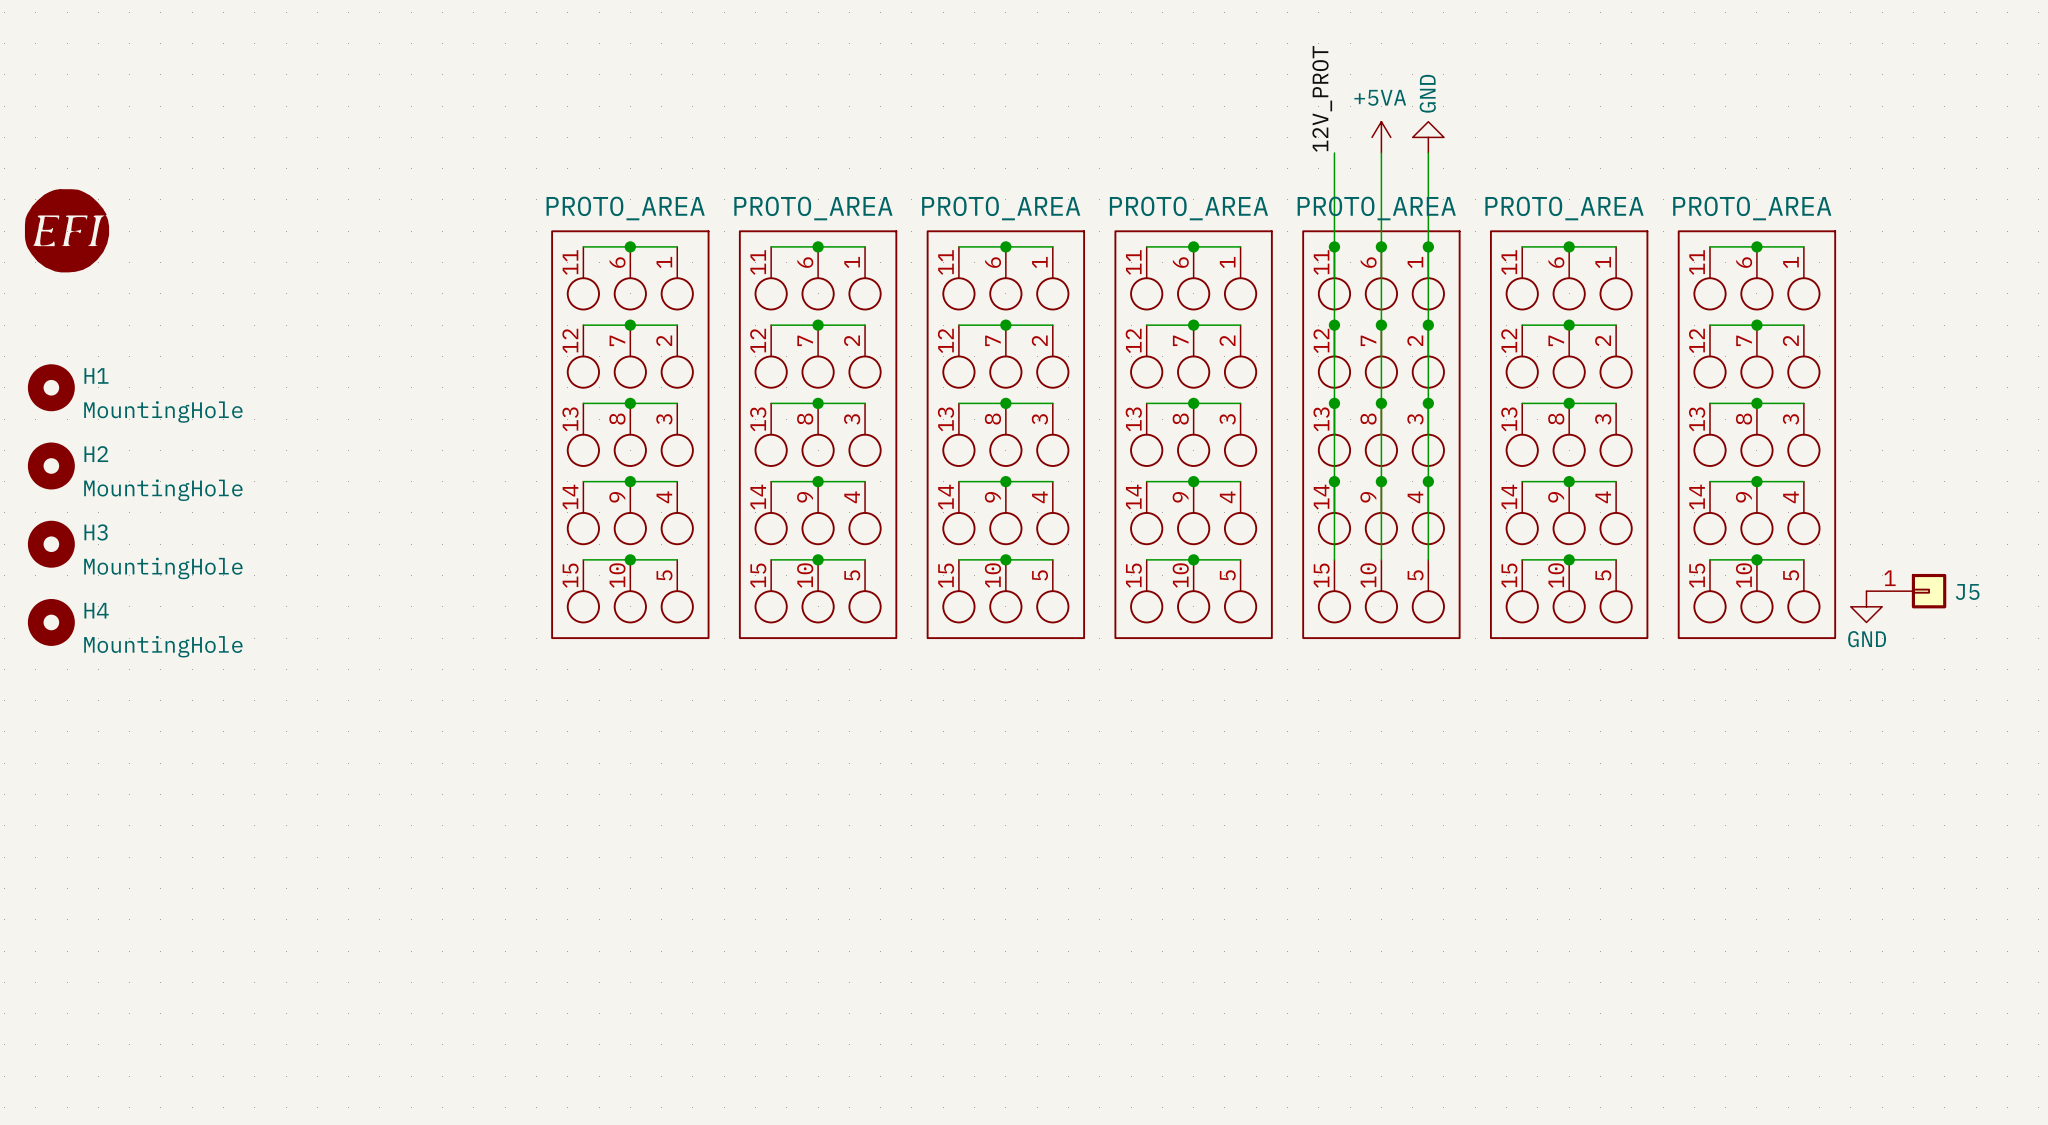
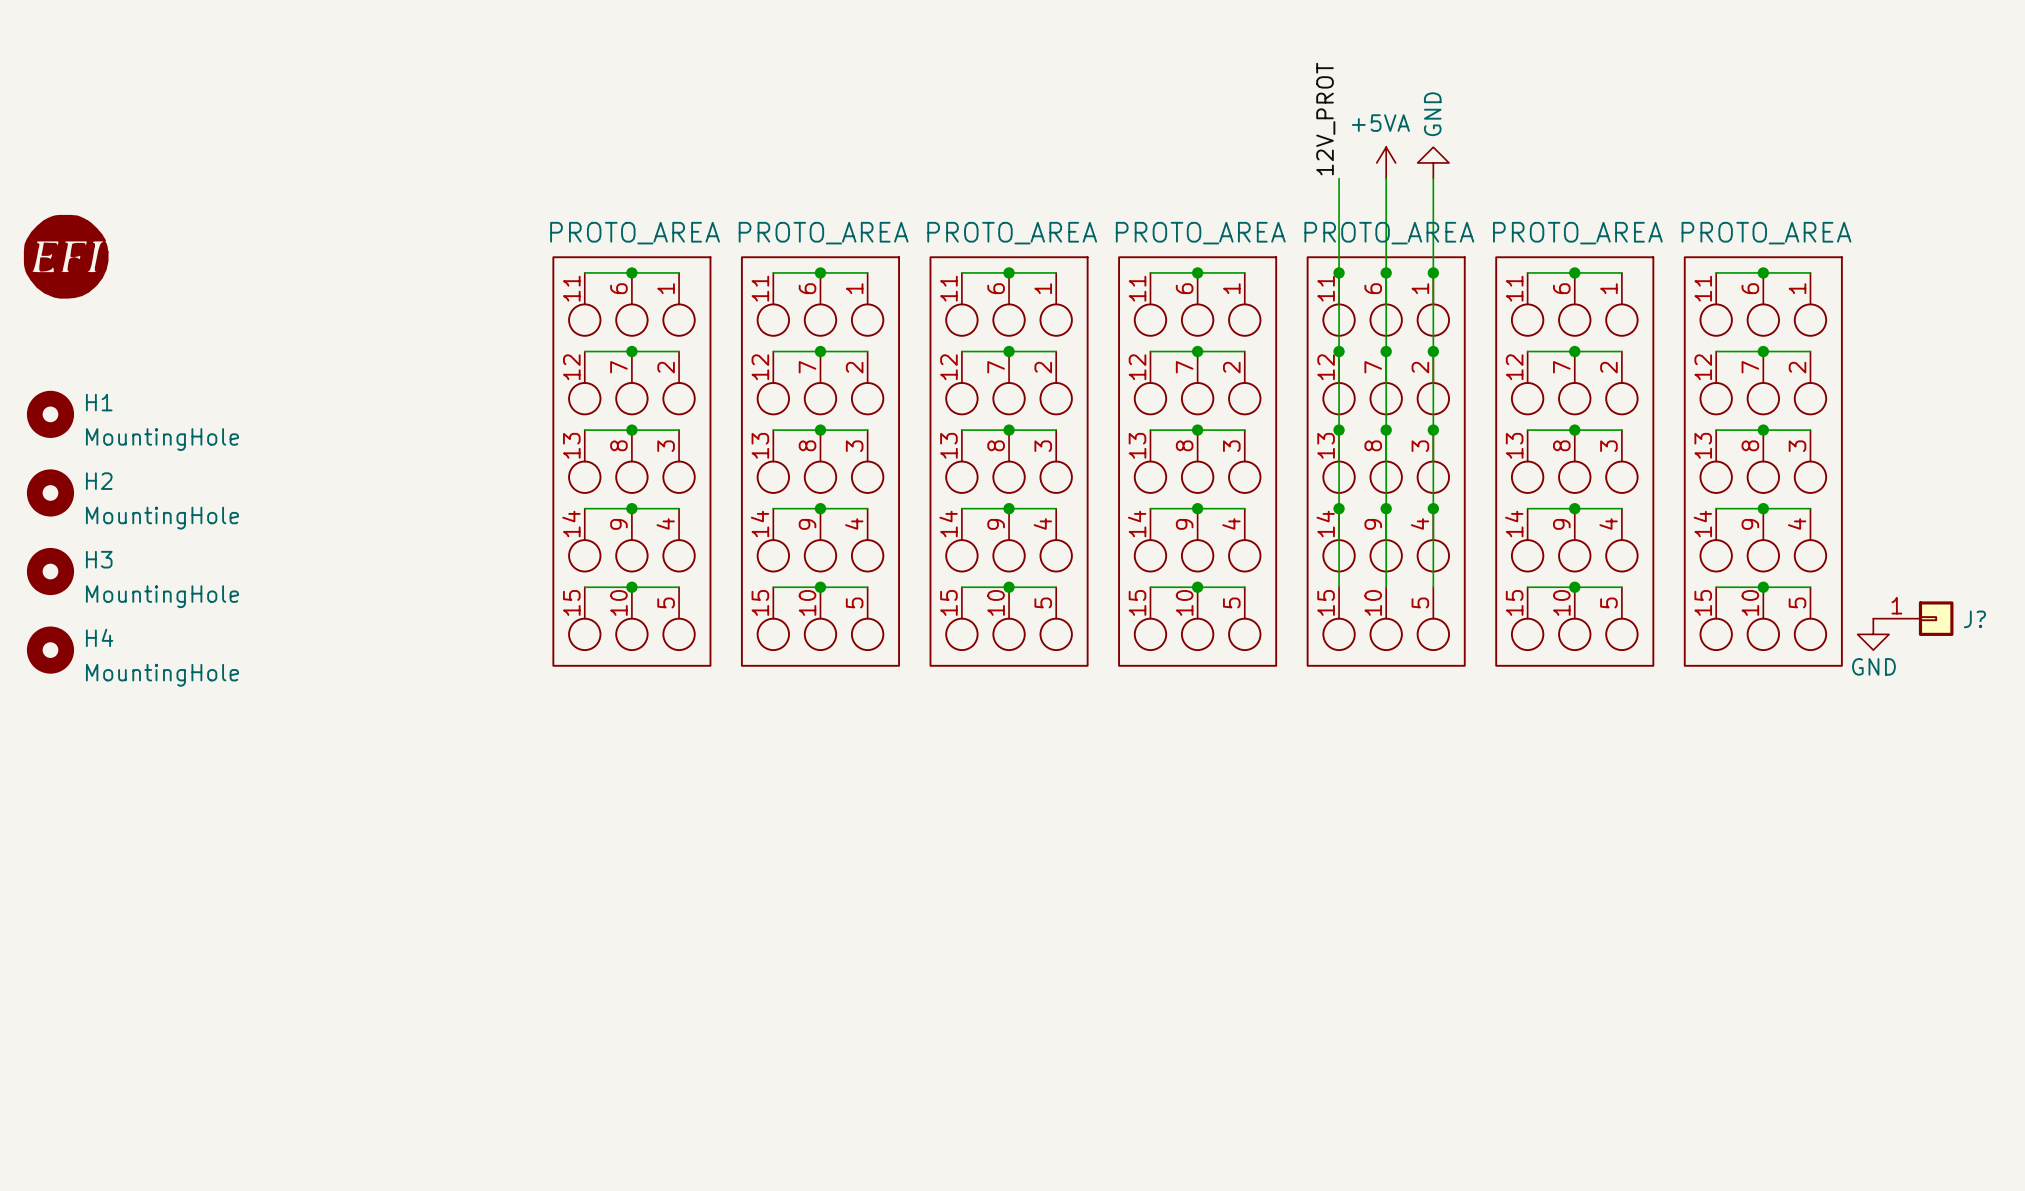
J5 name: J5 (1967, 591) -> J? (1974, 619)

